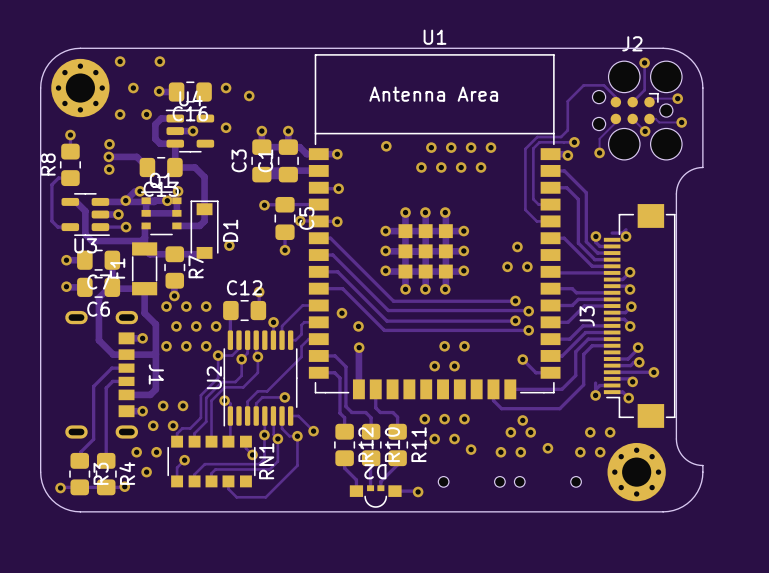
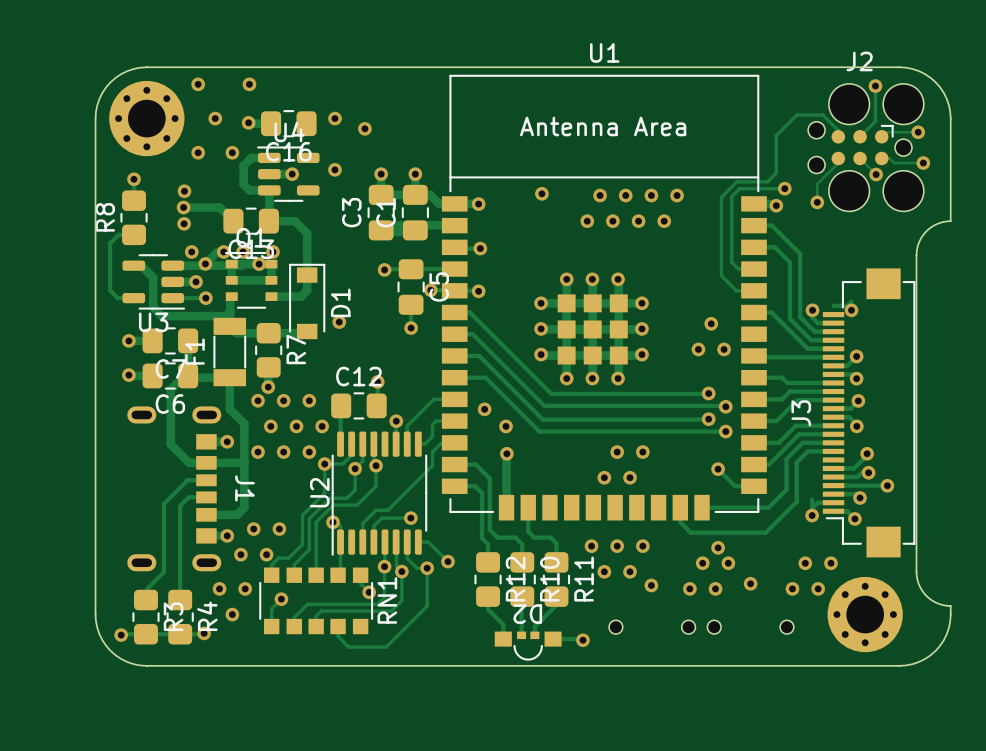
via: none -> (191, 251)
via: none -> (243, 251)

